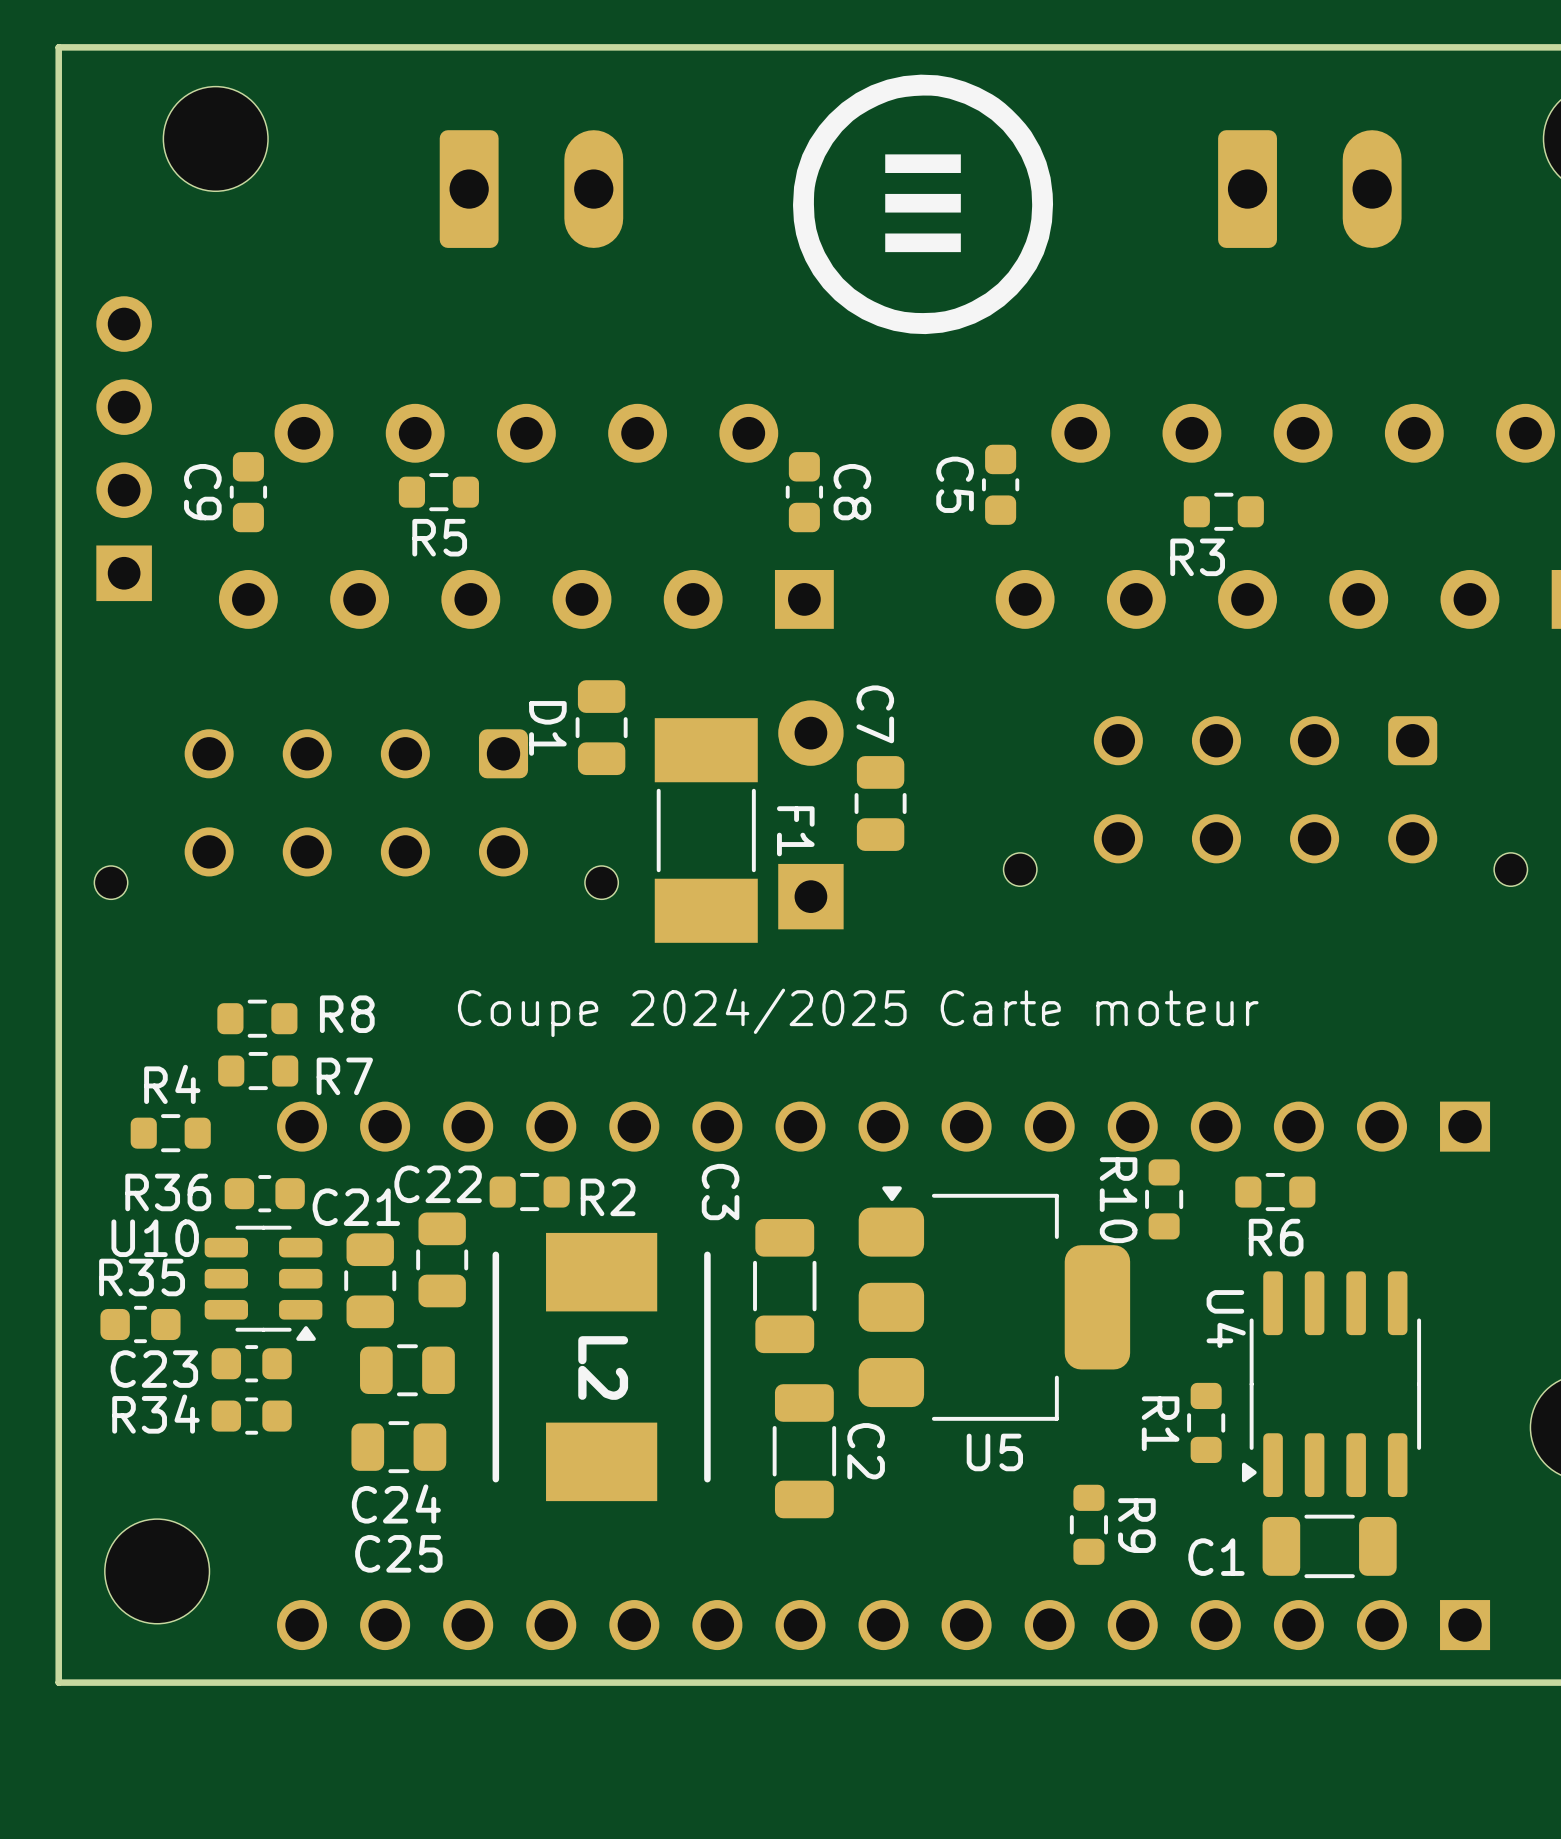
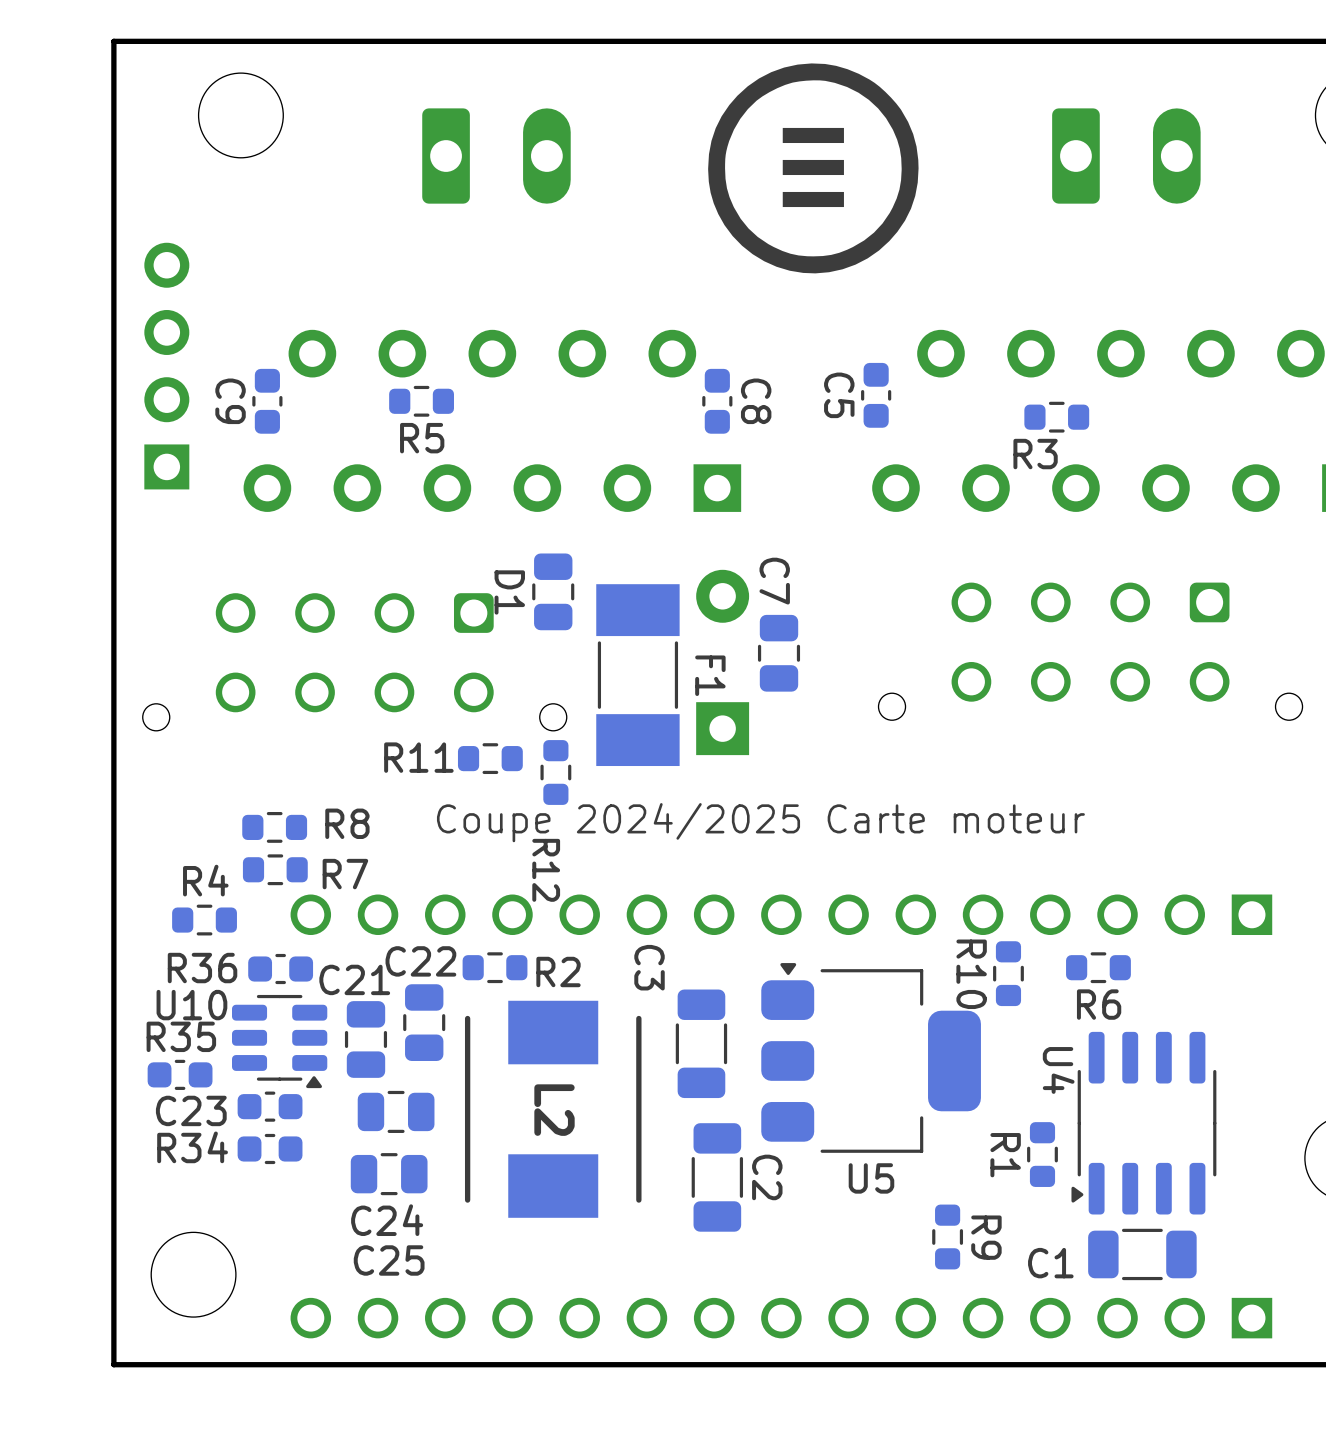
R11: none -> (490, 758)
R12: none -> (555, 772)

